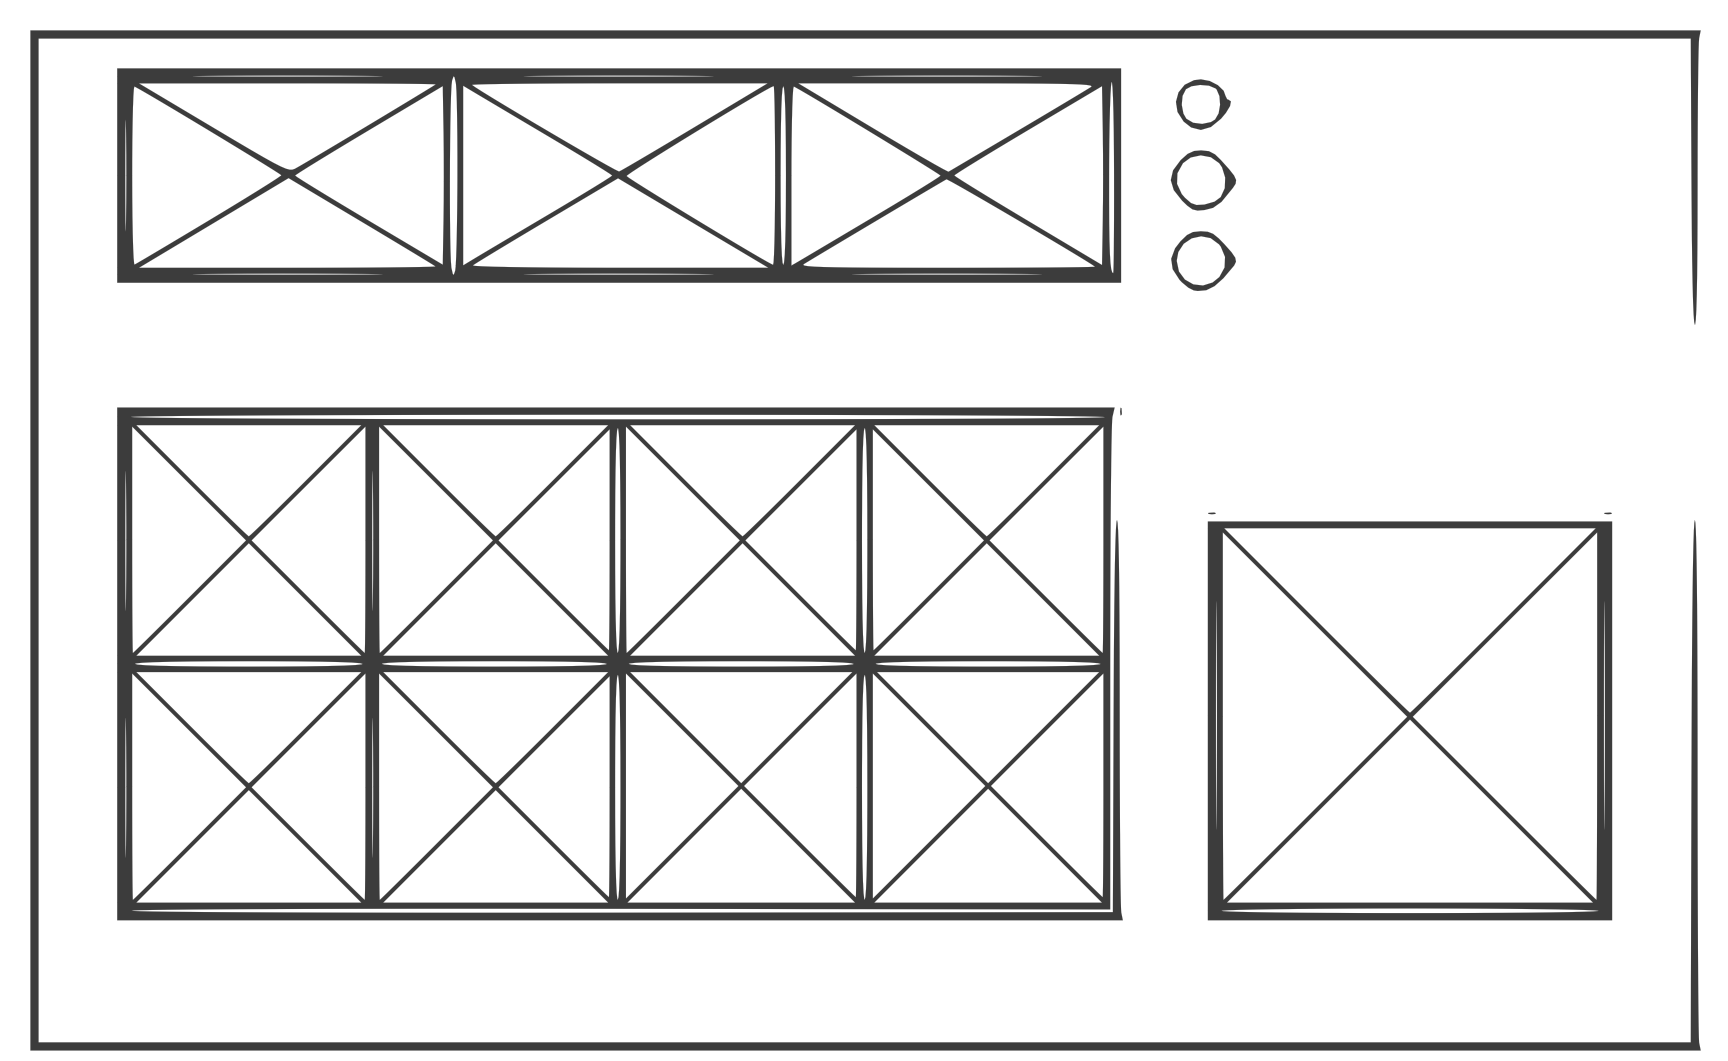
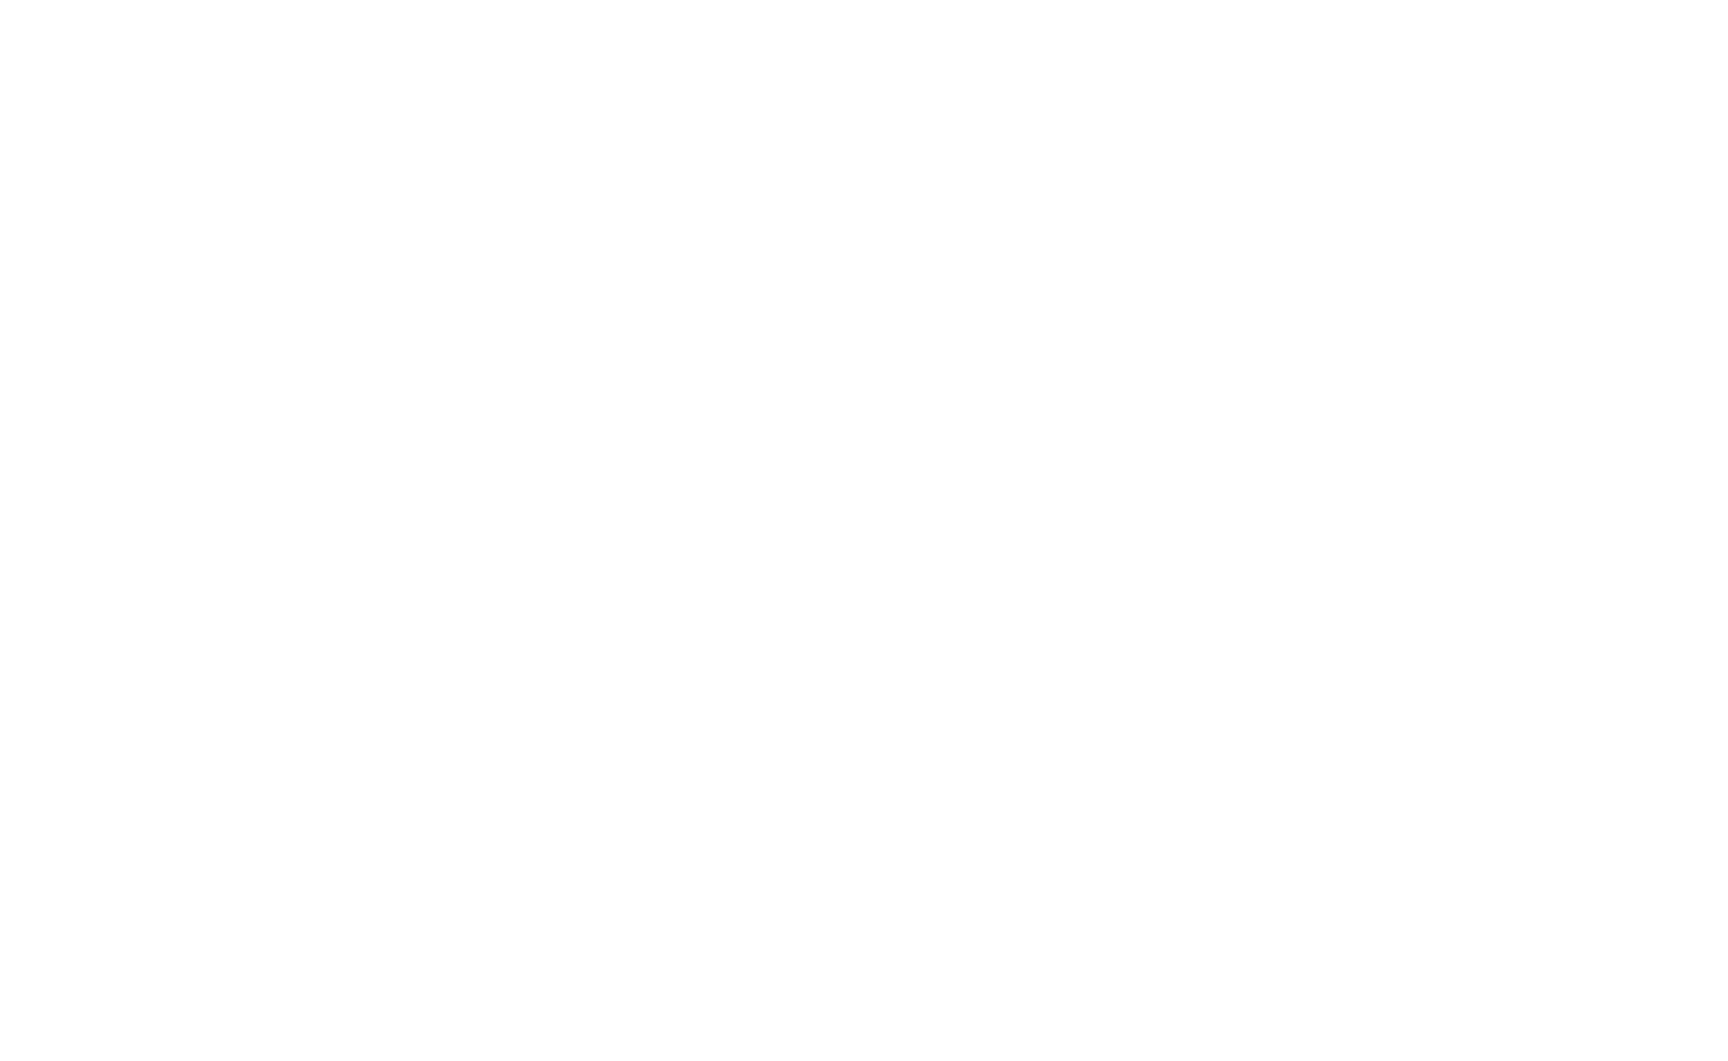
drawing: [30, 30, 1701, 1051] -> none

